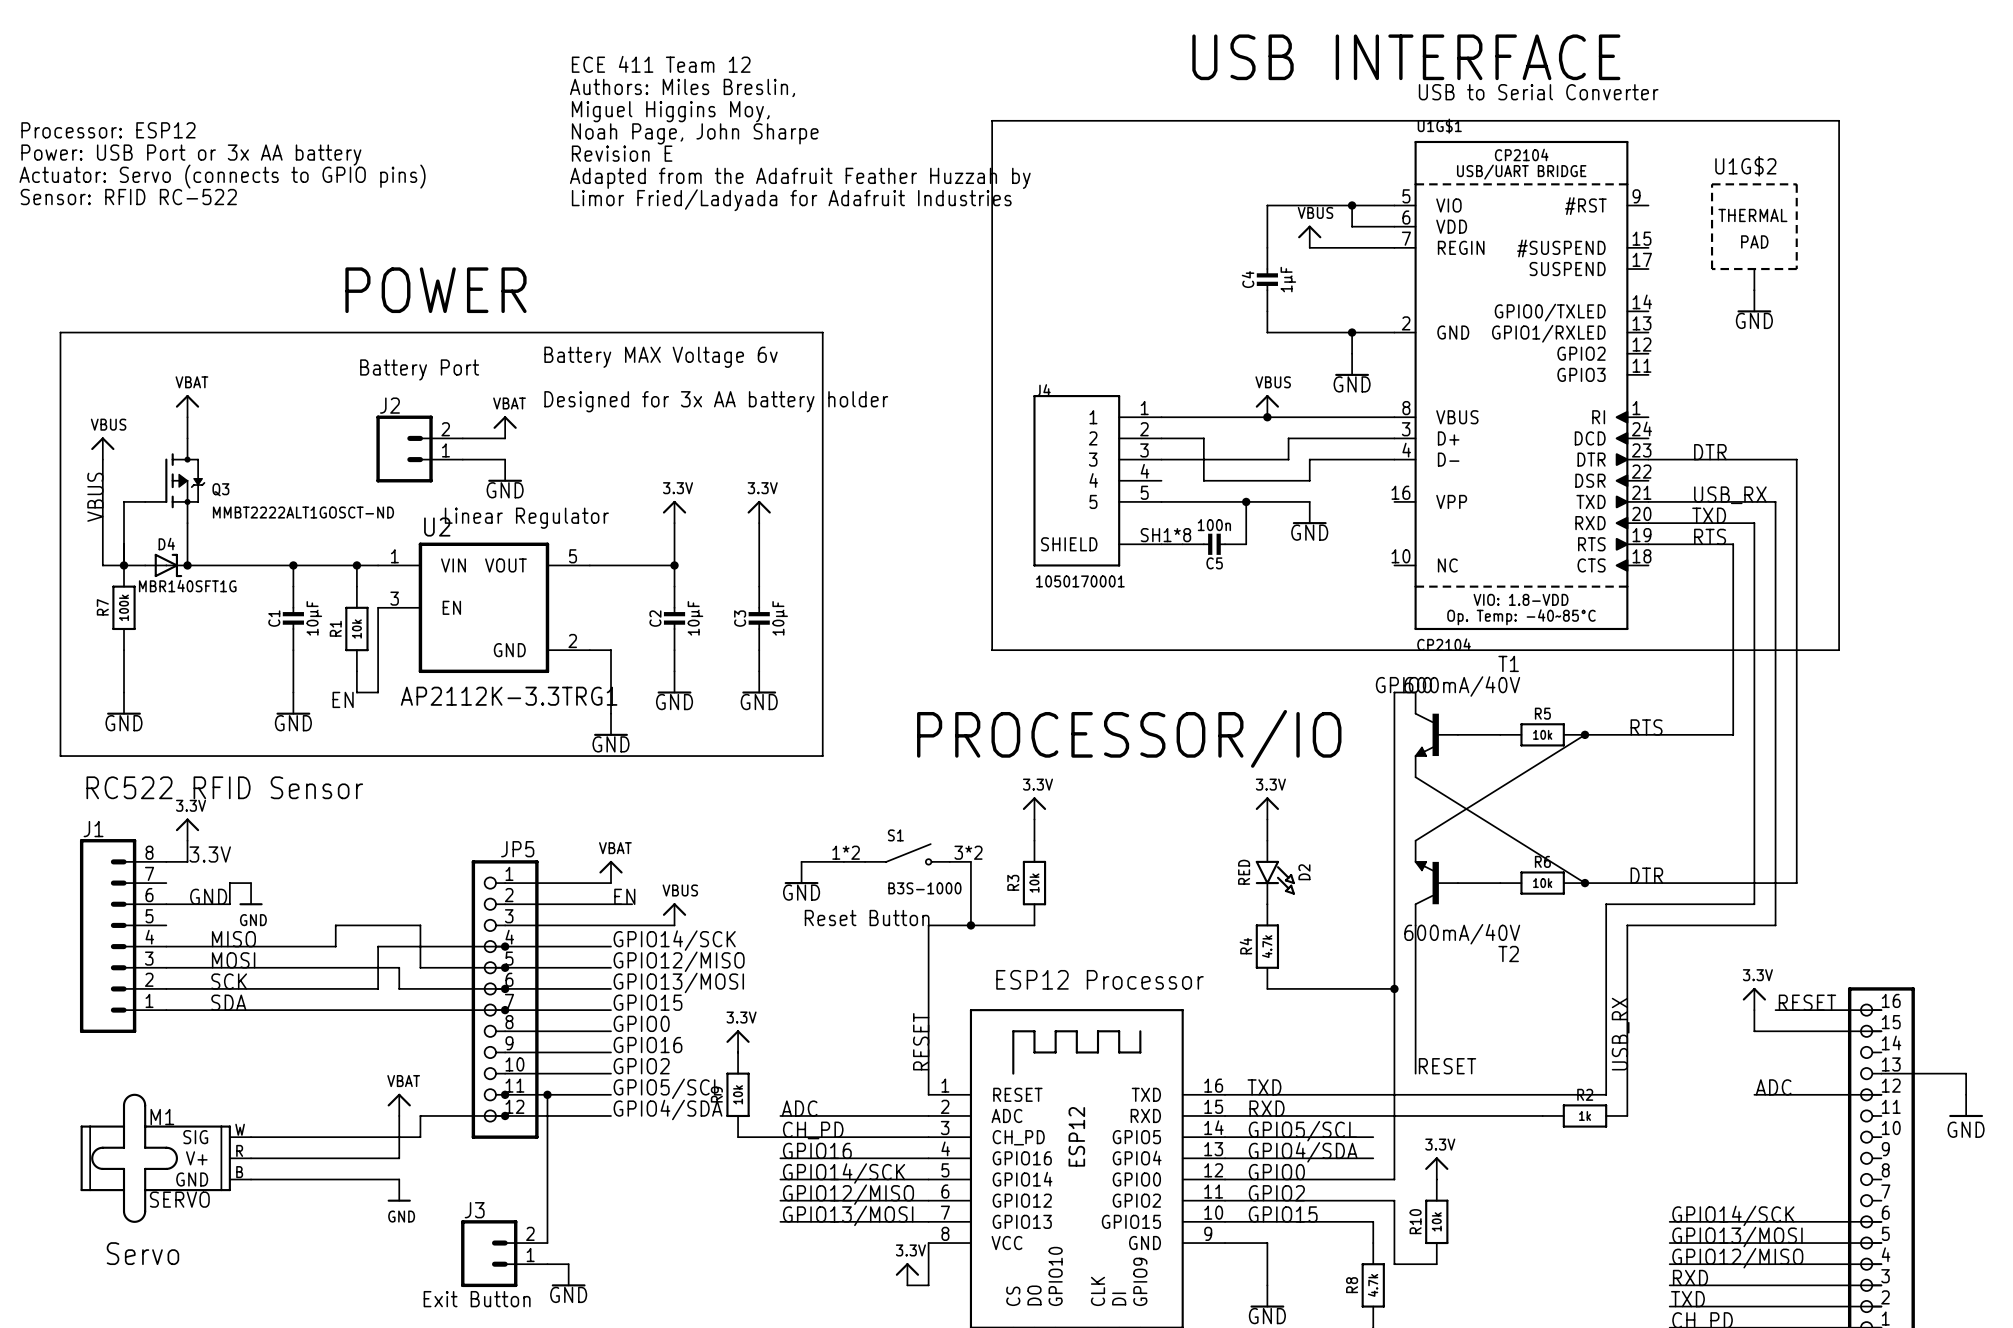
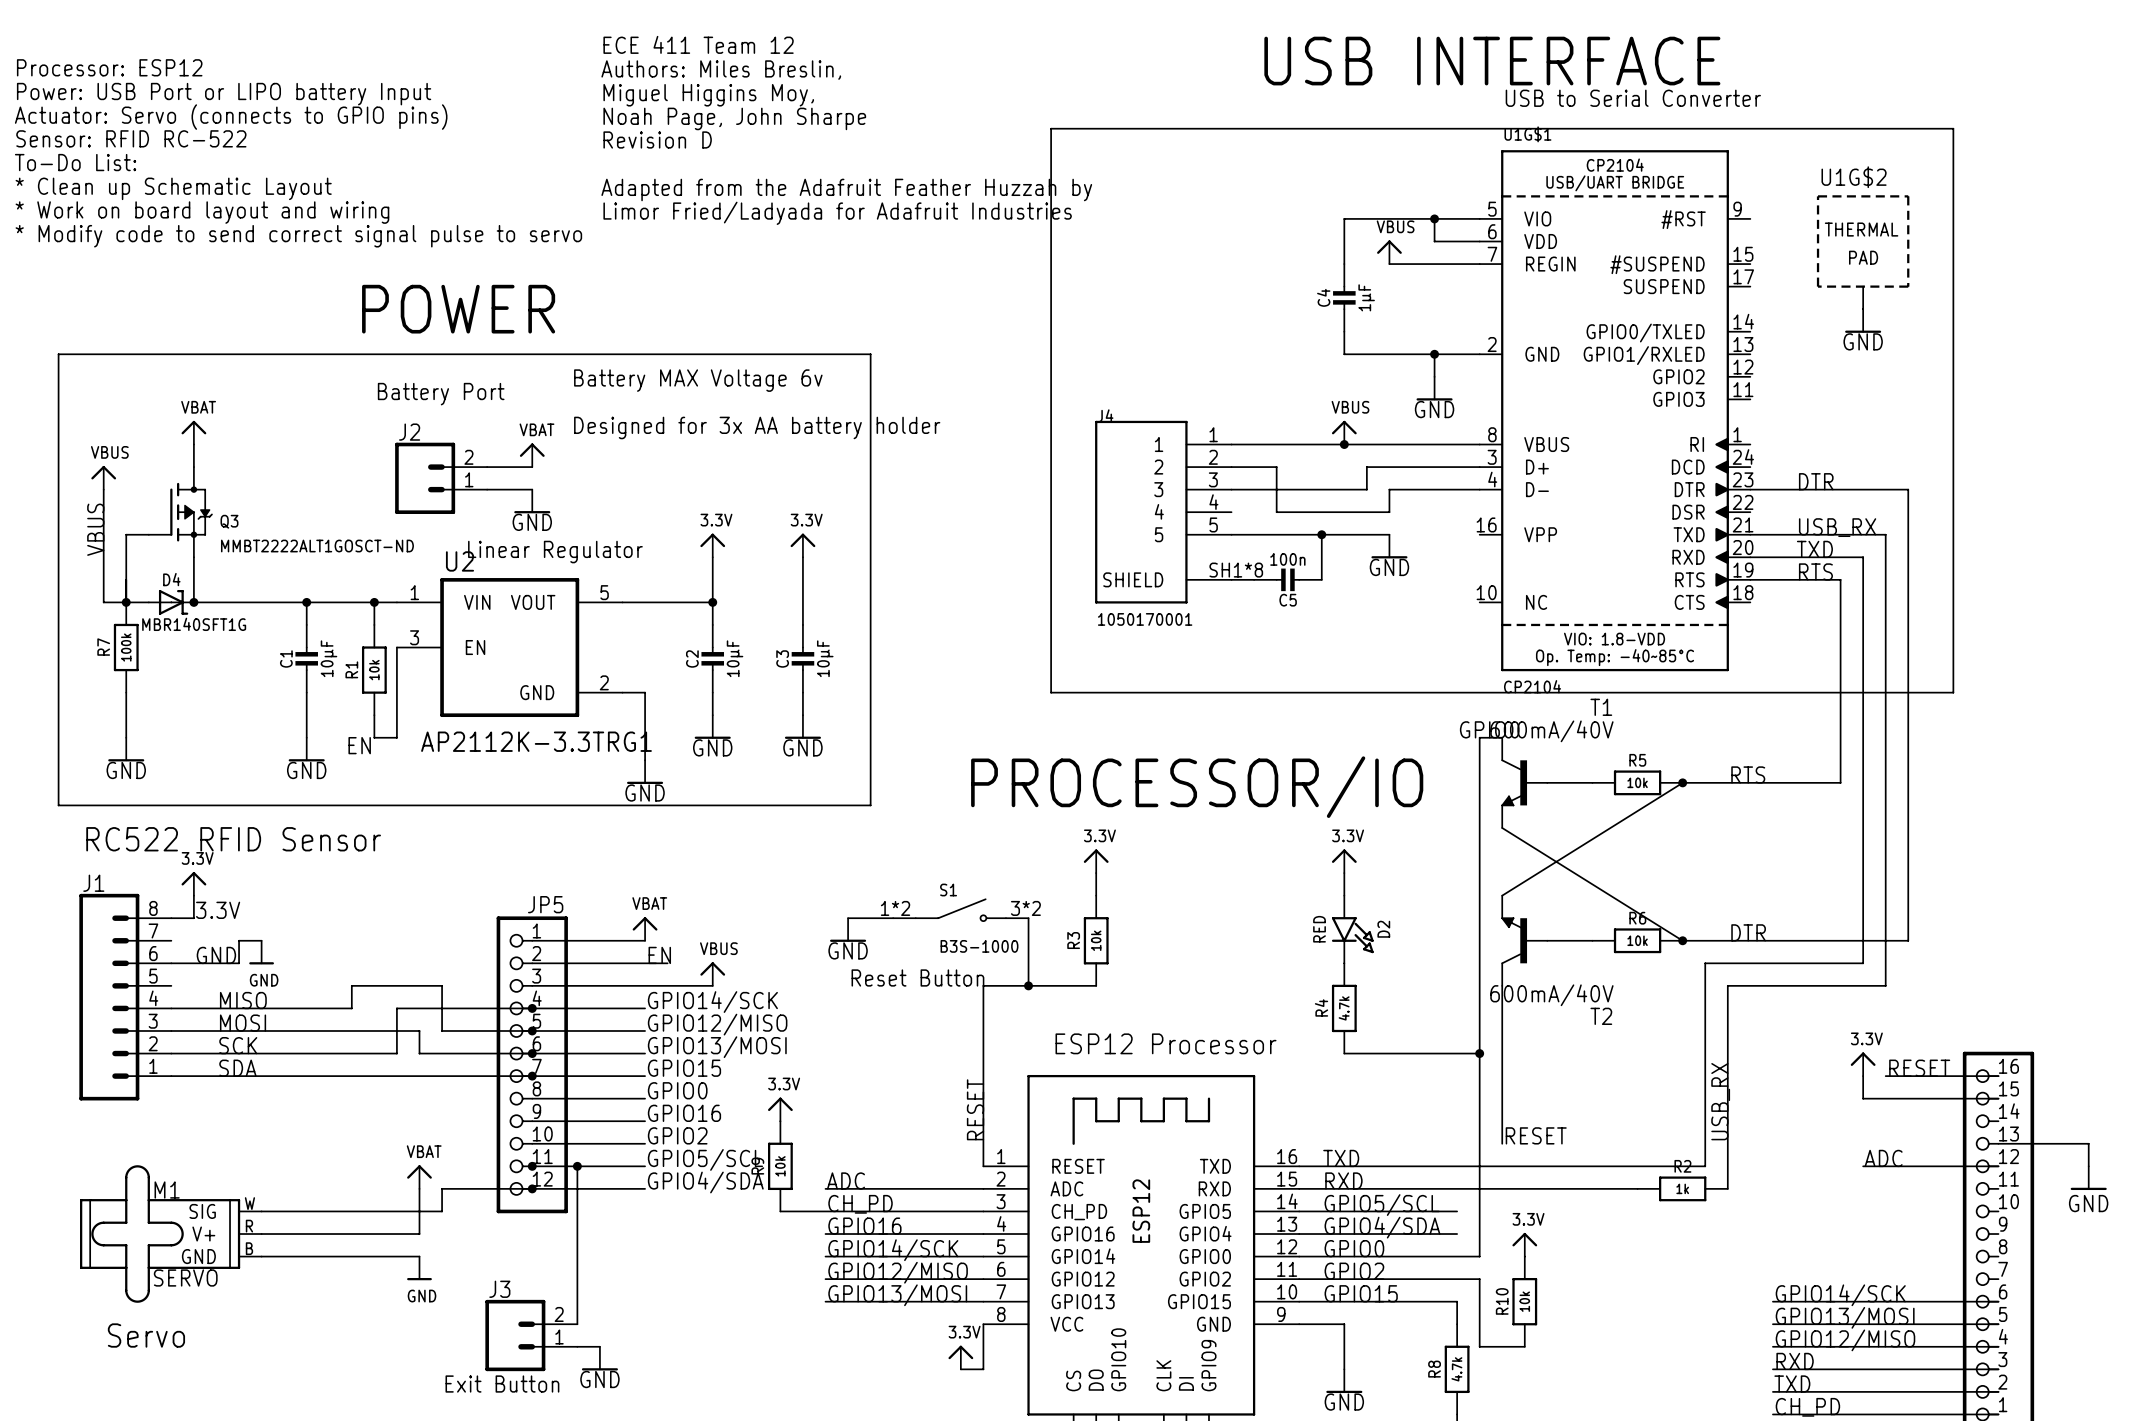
text: none -> ECE 411 Team 12 (698, 44)
text: none -> Processor: ESP12 (109, 67)
text: ECE 411 Team 12 (661, 64) -> Authors: Miles Breslin, (721, 70)
text: Authors: Miles Breslin, (682, 87) -> Miguel Higgins Moy, (708, 95)
text: none -> Power: USB Port or LIPO battery Input (224, 94)
text: none -> Actuator: Servo (connects to GPIO pins) (231, 117)
text: Miguel Higgins Moy, (670, 111) -> Noah Page, John Sharpe (734, 118)
text: Processor: ESP12 (108, 130) -> Sensor: RFID RC-522 (131, 138)
text: Noah Page, John Sharpe (695, 133) -> Revision D (657, 139)
text: Revision E (622, 153) -> none
text: Power: USB Port or 3x AA battery (191, 155) -> To-Do List: (75, 162)
text: Actuator: Servo (connects to GPIO pins) (222, 176) -> * Clean up Schematic Layout (173, 188)
text: Sensor: RFID RC-522 (128, 197) -> * Work on board layout and wiring (202, 212)
text: none -> * Modify code to send correct signal pulse to servo (298, 236)

